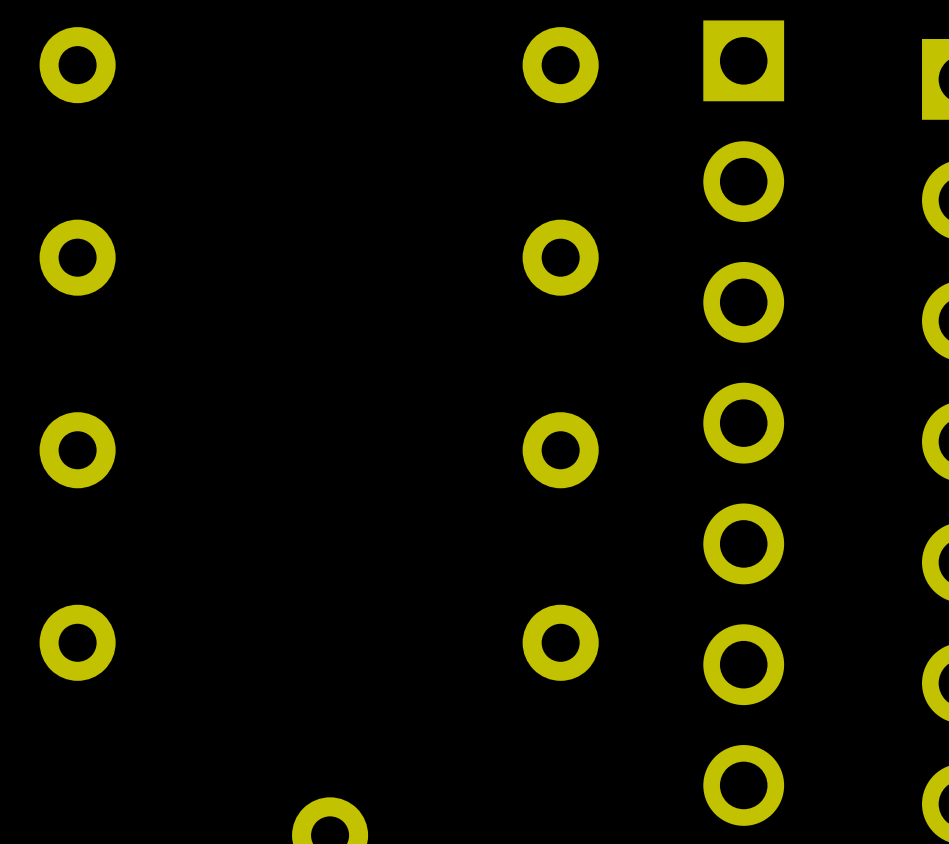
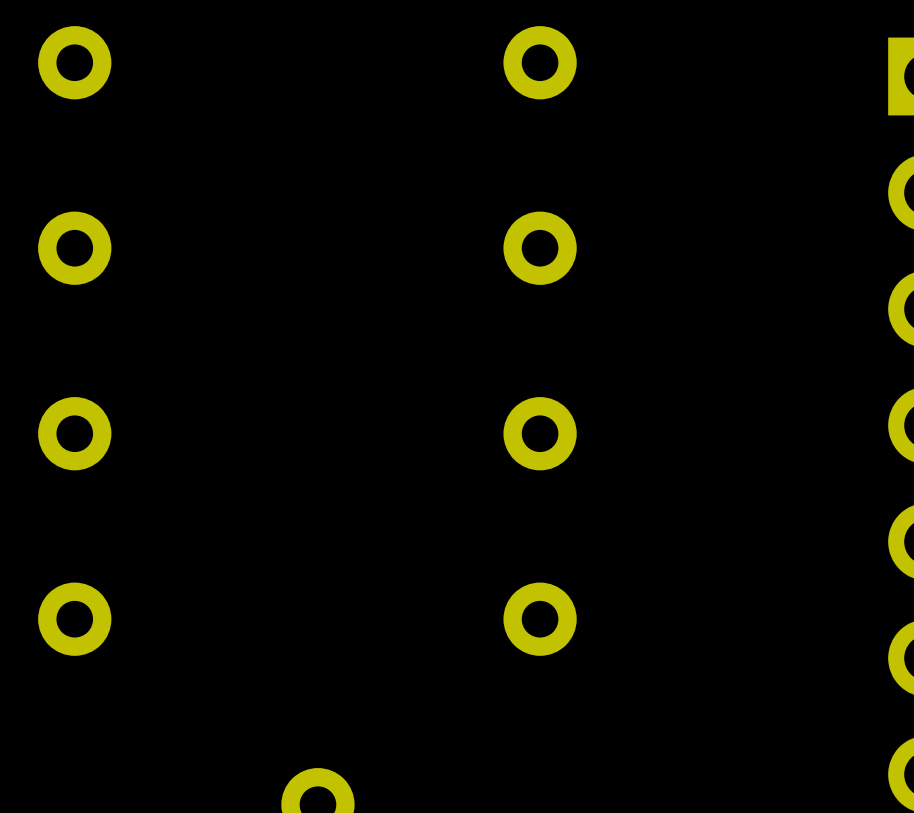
part: (743, 423) -> none

